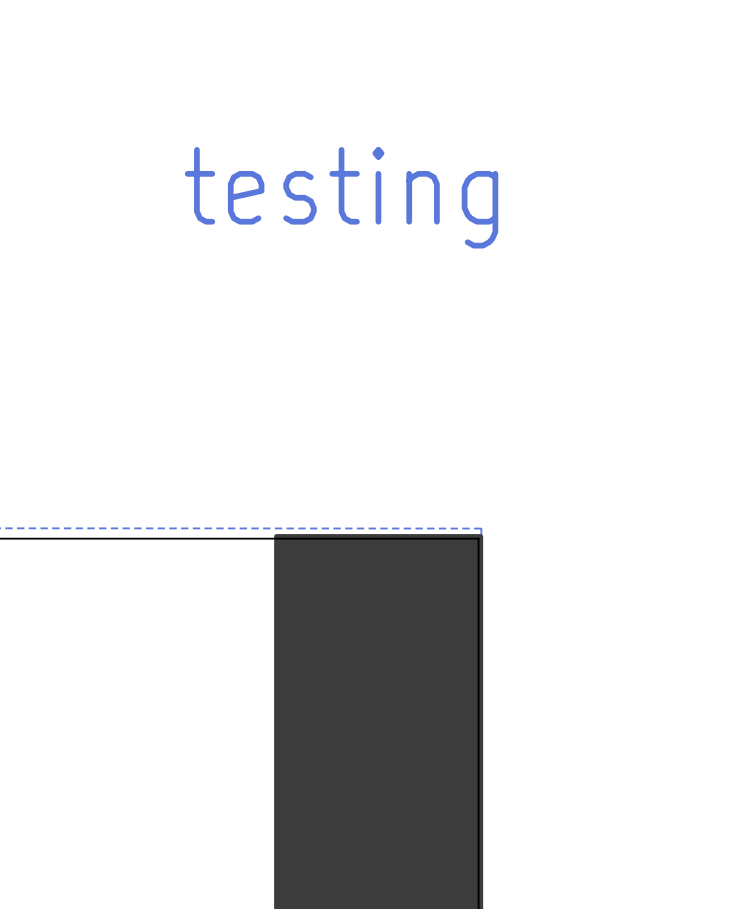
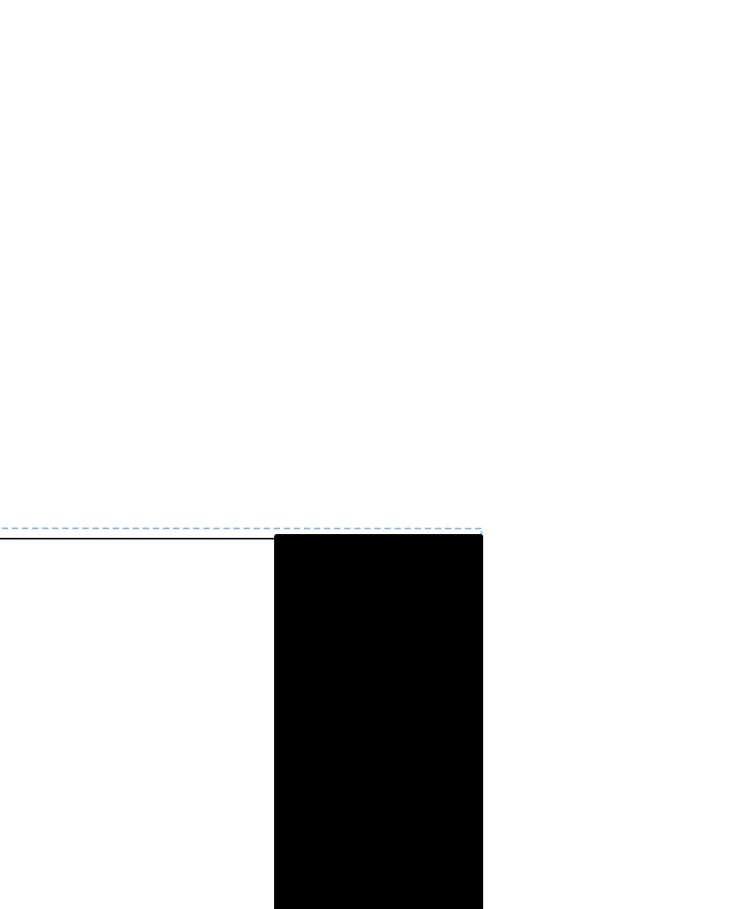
text: testing (341, 197) -> none

